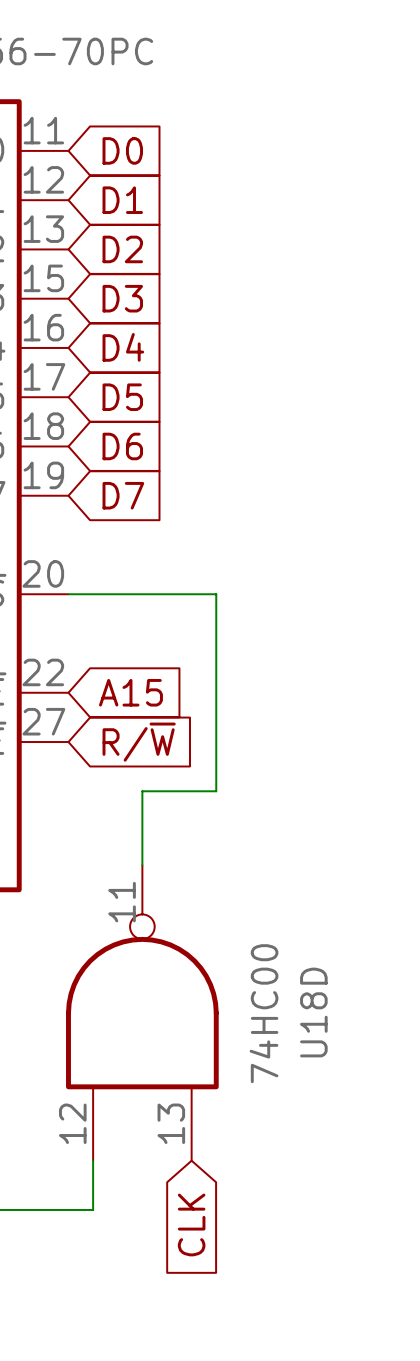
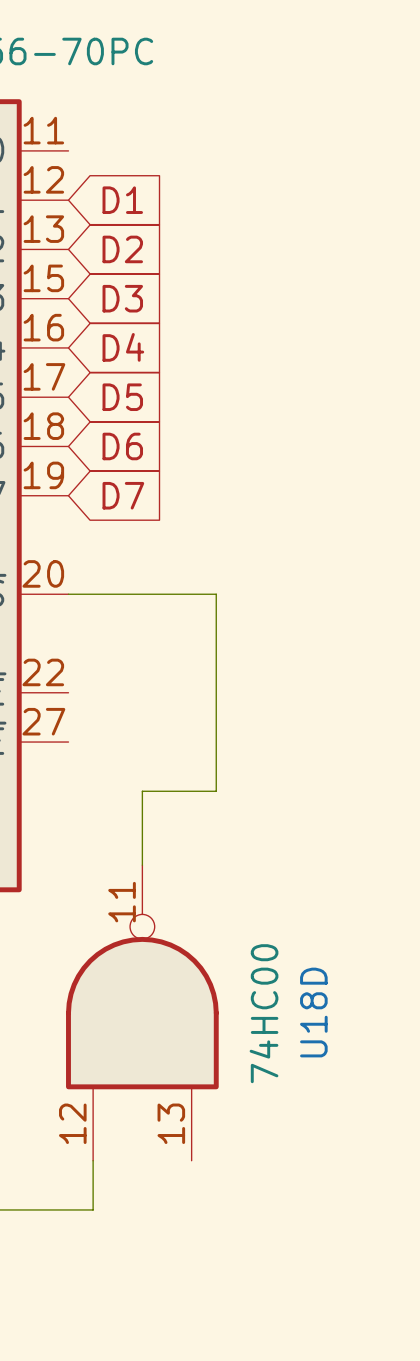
global label: D0 (122, 150) -> none
global label: A15 (130, 692) -> none
global label: R/~{W} (139, 742) -> none
global label: CLK (191, 1224) -> none

